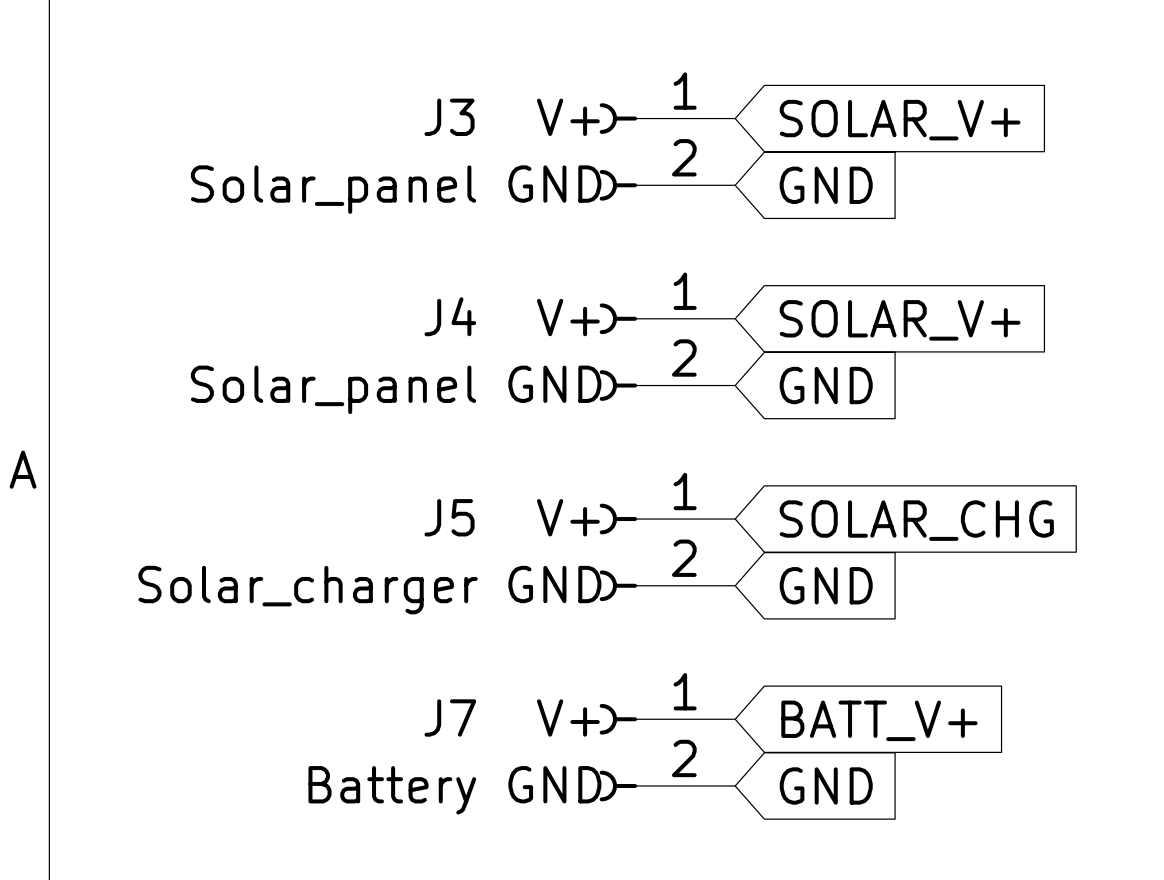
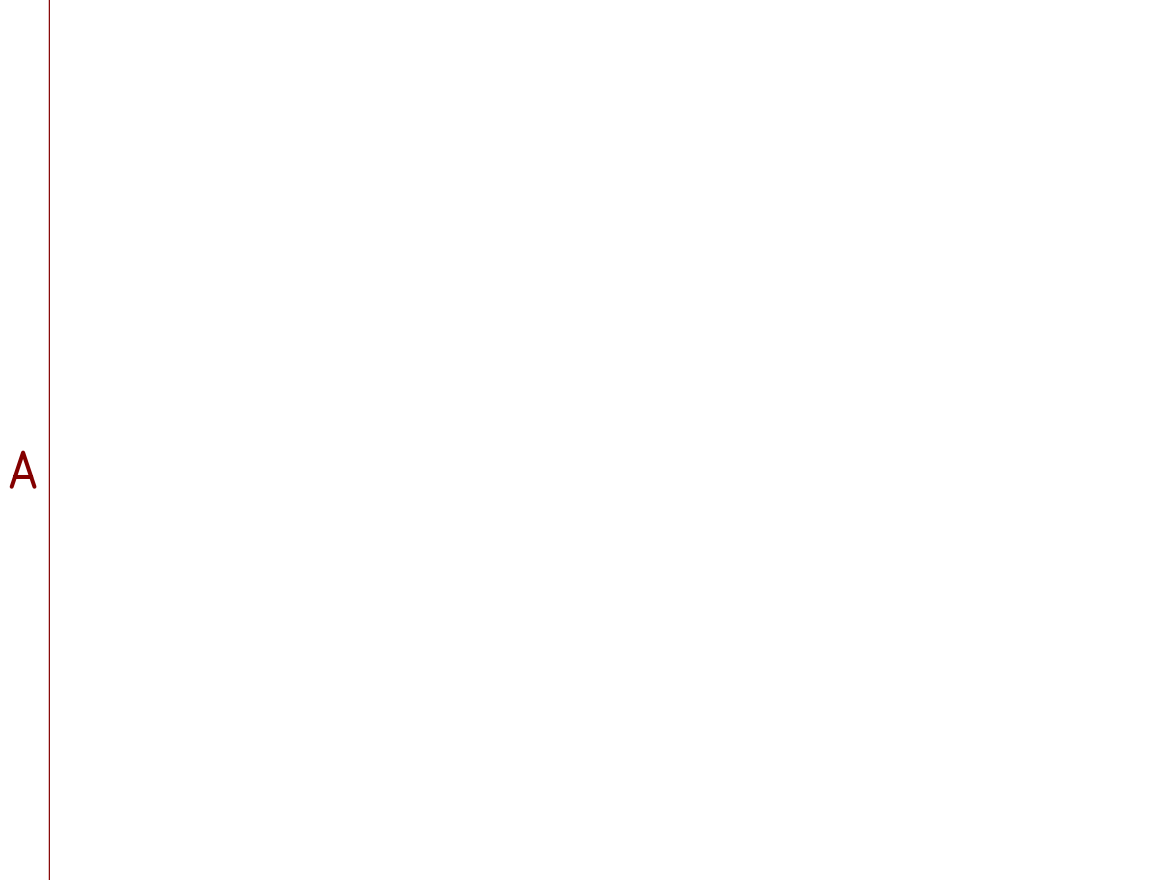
global label: SOLAR_V+ (900, 120) -> none
J3: Solar_panel (667, 151) -> none
global label: GND (826, 185) -> none
global label: SOLAR_V+ (900, 320) -> none
J4: Solar_panel (667, 352) -> none
global label: GND (826, 385) -> none
global label: SOLAR_CHG (916, 520) -> none
J5: Solar_charger (667, 552) -> none
global label: GND (826, 585) -> none
global label: BATT_V+ (879, 720) -> none
J7: Battery (667, 752) -> none
global label: GND (826, 785) -> none

